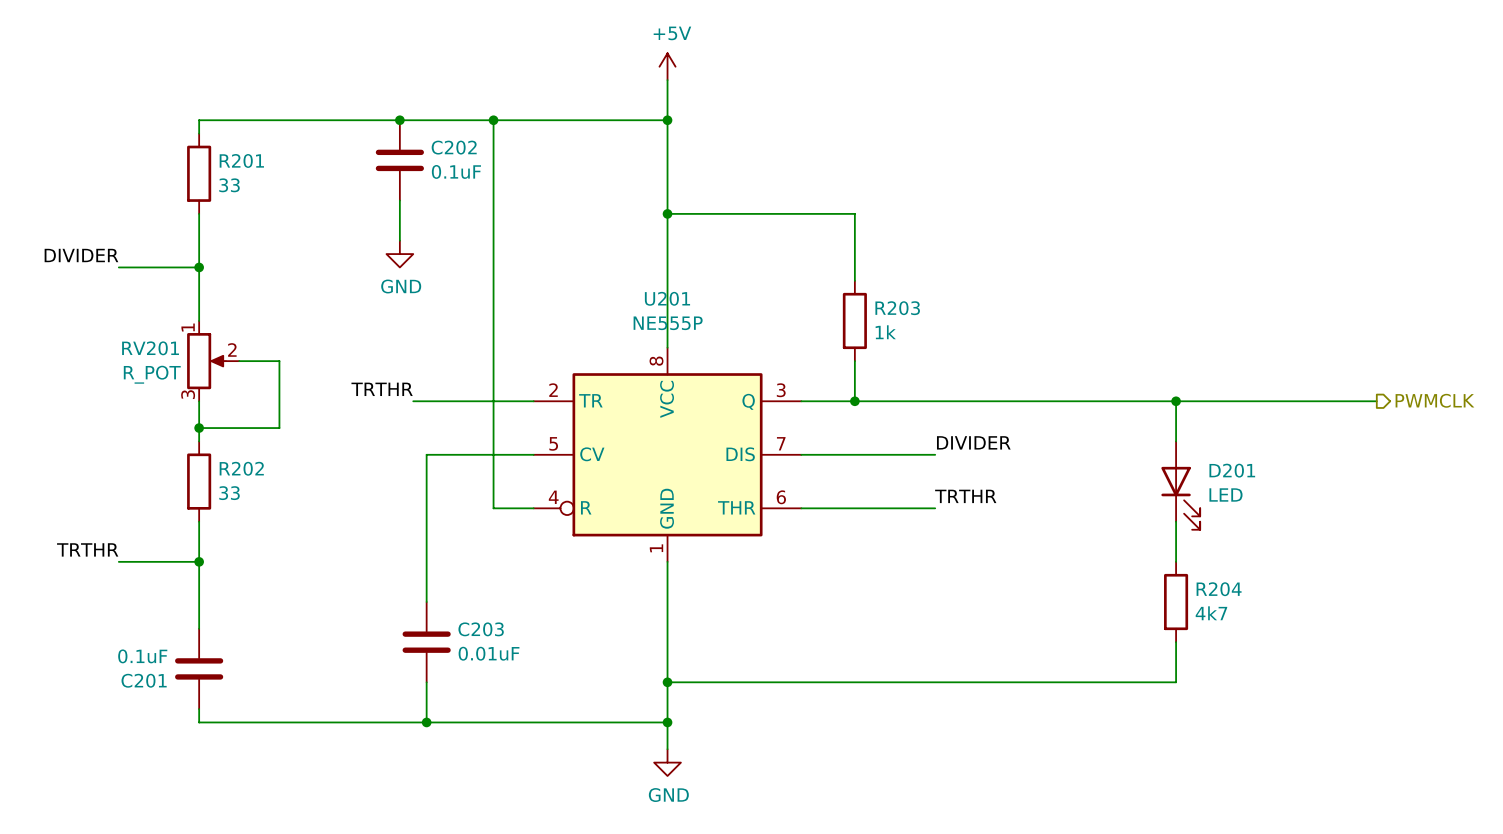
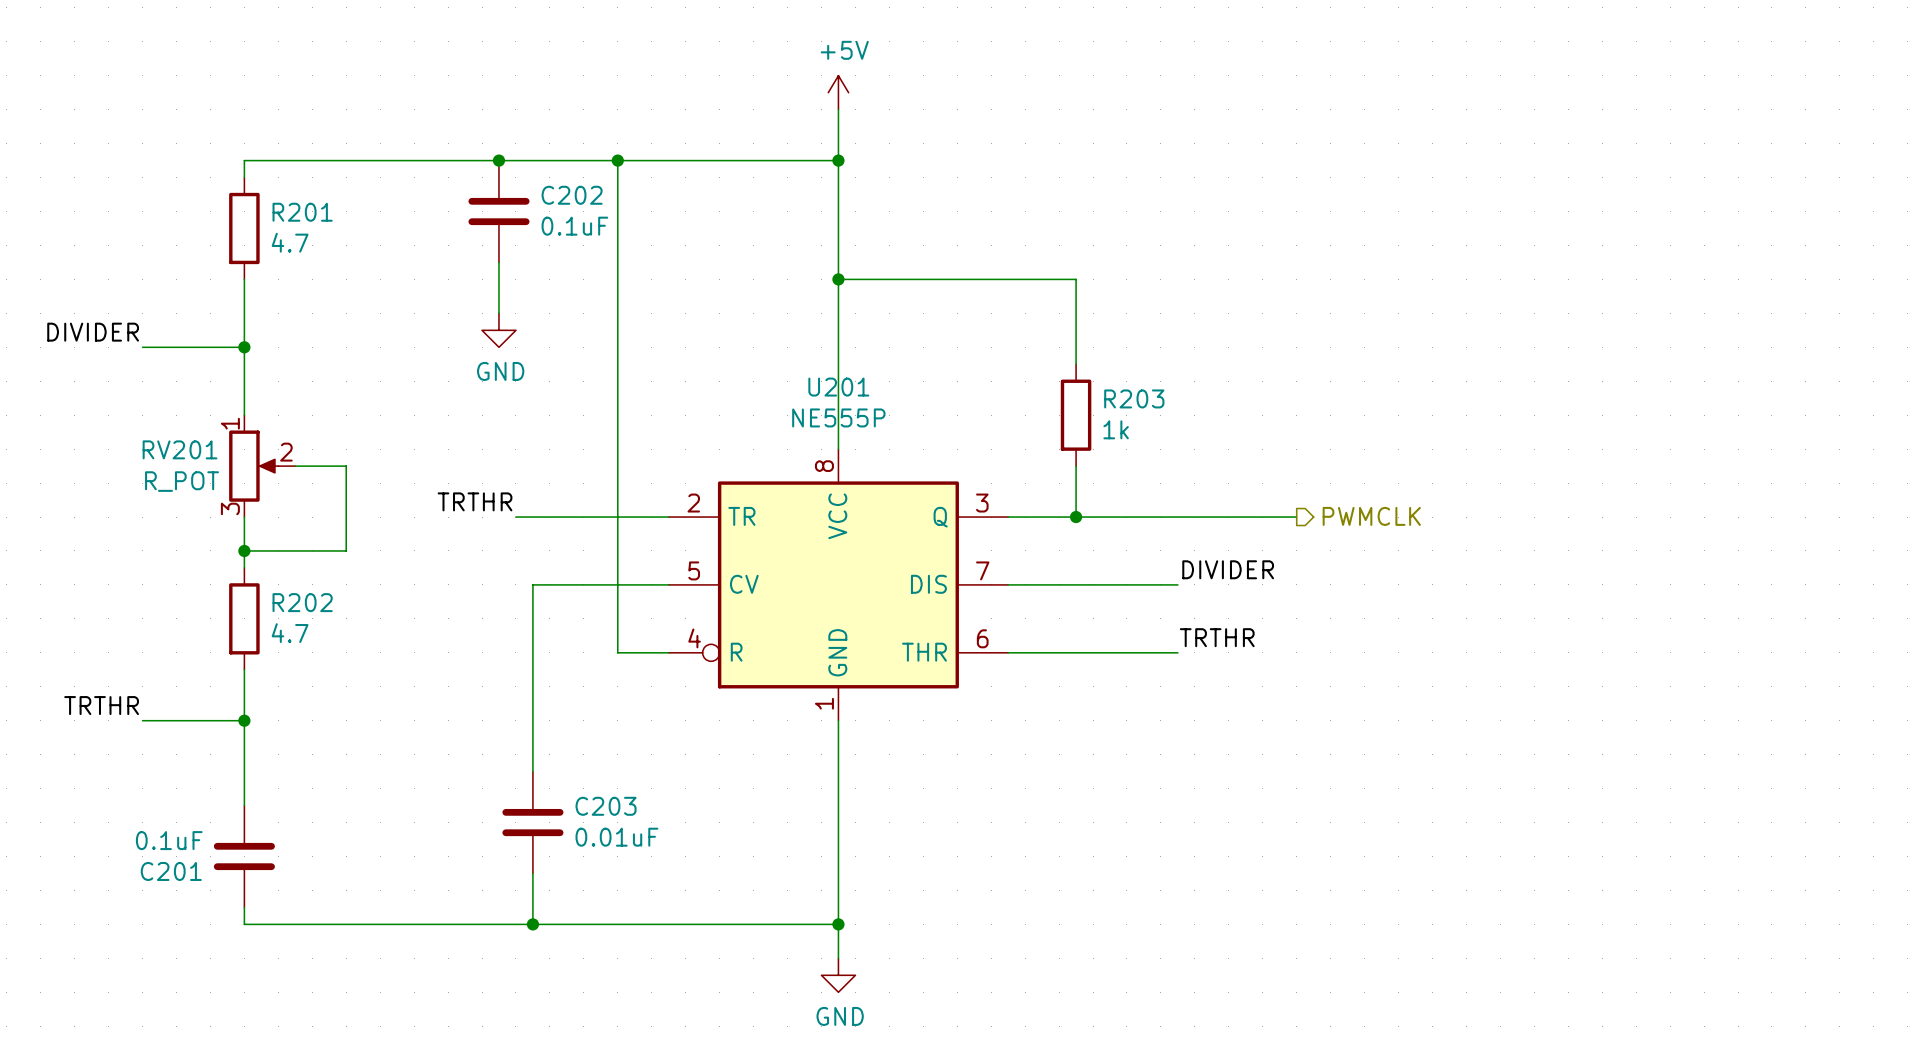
R201 value: 33 (229, 185) -> 4.7 (290, 242)
hierarchical label: none -> PWMCLK (1371, 516)
hierarchical label: PWMCLK (1434, 400) -> none
wire: (1028, 401) (1376, 401) -> none
wire: (1176, 401) (1176, 441) -> none
junction: (1176, 401) -> none
D201: LED (1180, 485) -> none
R202 value: 33 (229, 493) -> 4.7 (290, 633)
wire: (1176, 521) (1176, 561) -> none
R204: 4k7 (1176, 602) -> none
wire: (1176, 642) (1176, 682) (667, 682) -> none
junction: (667, 682) -> none

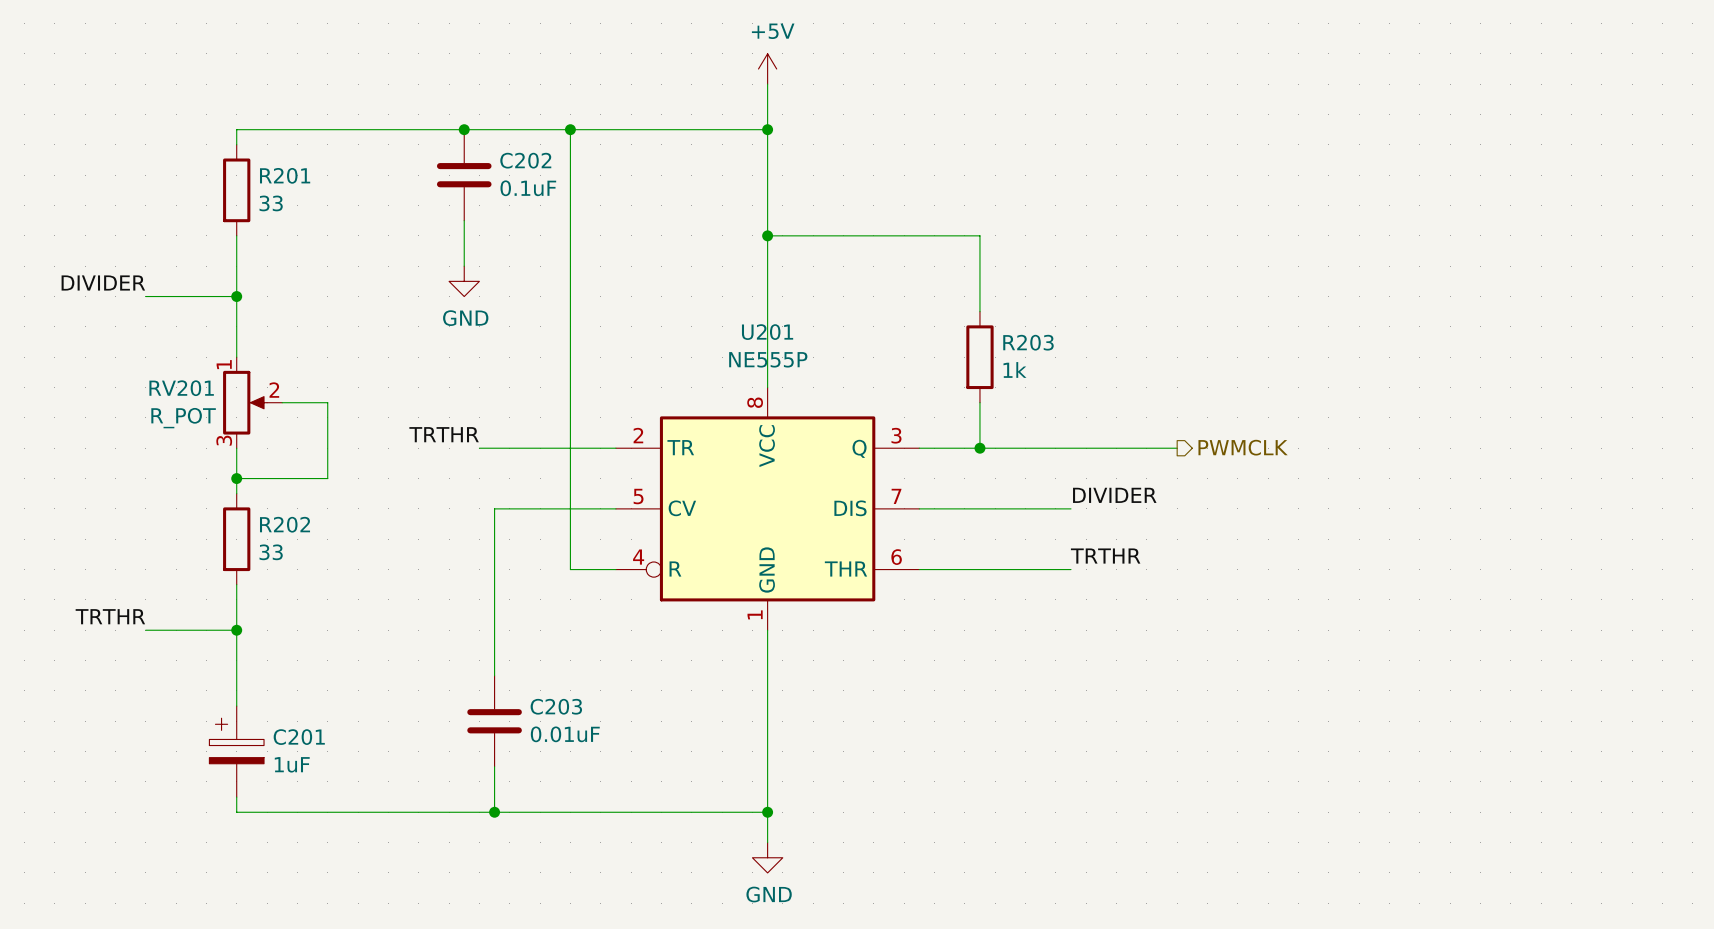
R201 value: 4.7 (290, 242) -> 33 (271, 203)
R202 value: 4.7 (290, 633) -> 33 (271, 552)
C201 symbol: [213, 805, 275, 908] -> [209, 706, 265, 798]
C201 value: 0.1uF (169, 840) -> 1uF (292, 764)
C201 name position: C201 (171, 871) -> C201 (299, 737)

